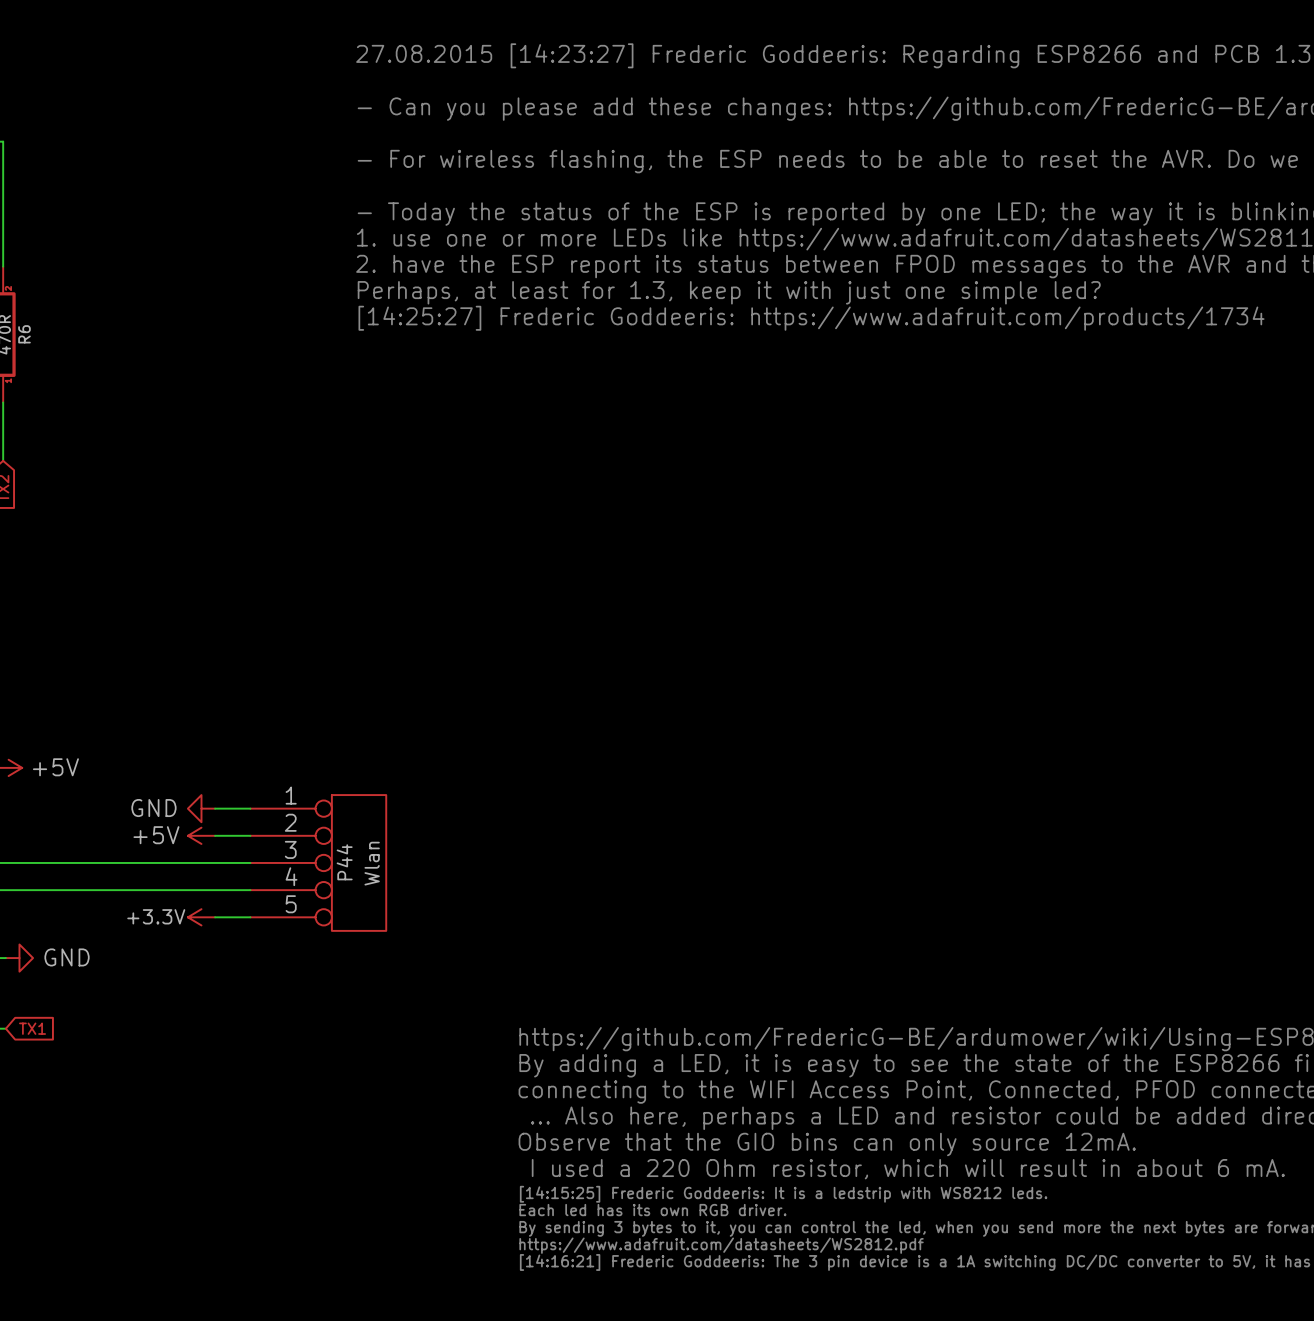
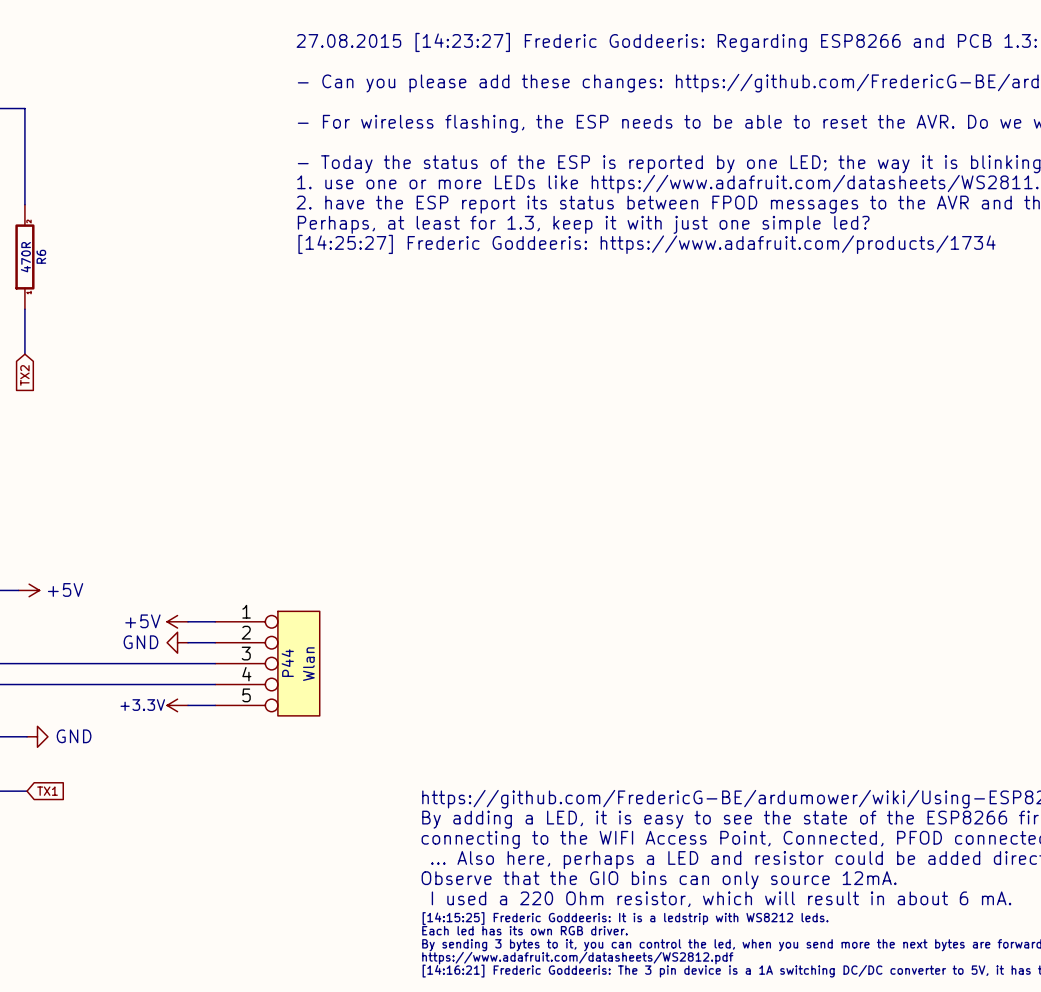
power symbol: GND (201, 808) -> +5V (177, 621)
power symbol: +5V (201, 835) -> GND (177, 642)

